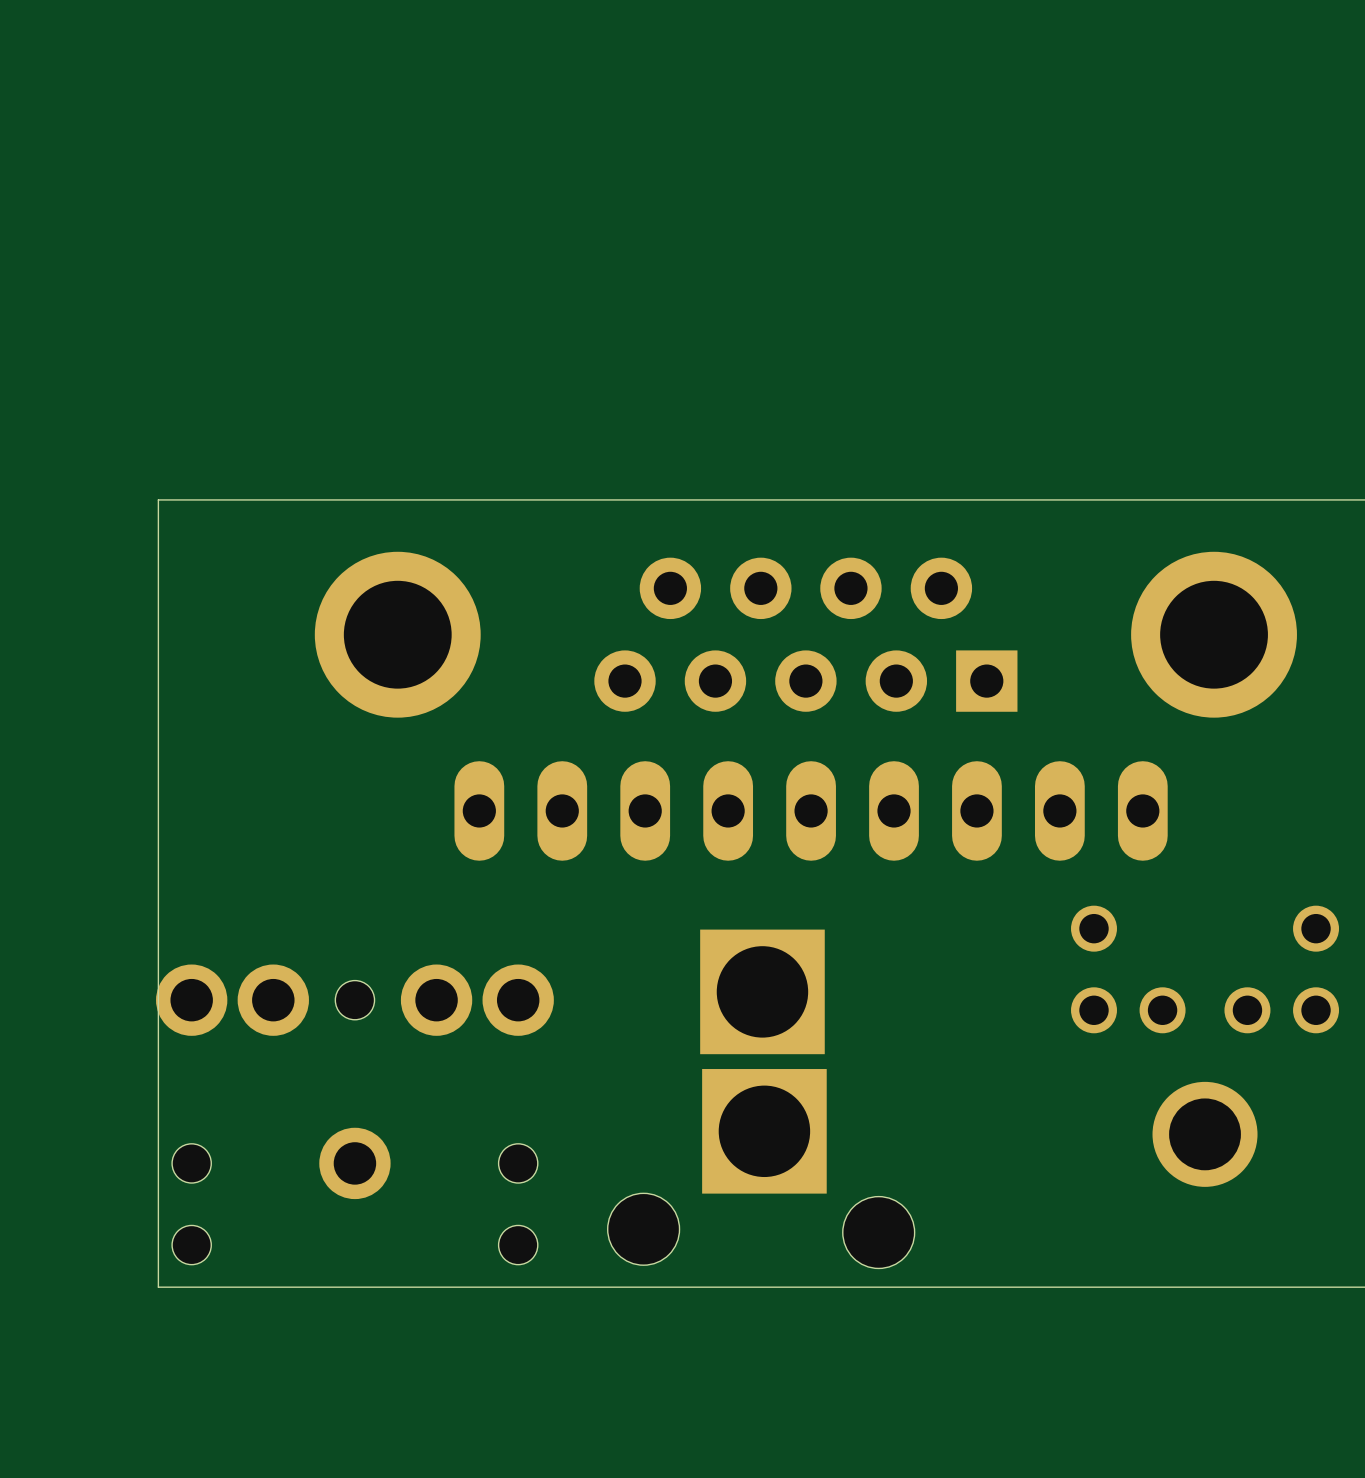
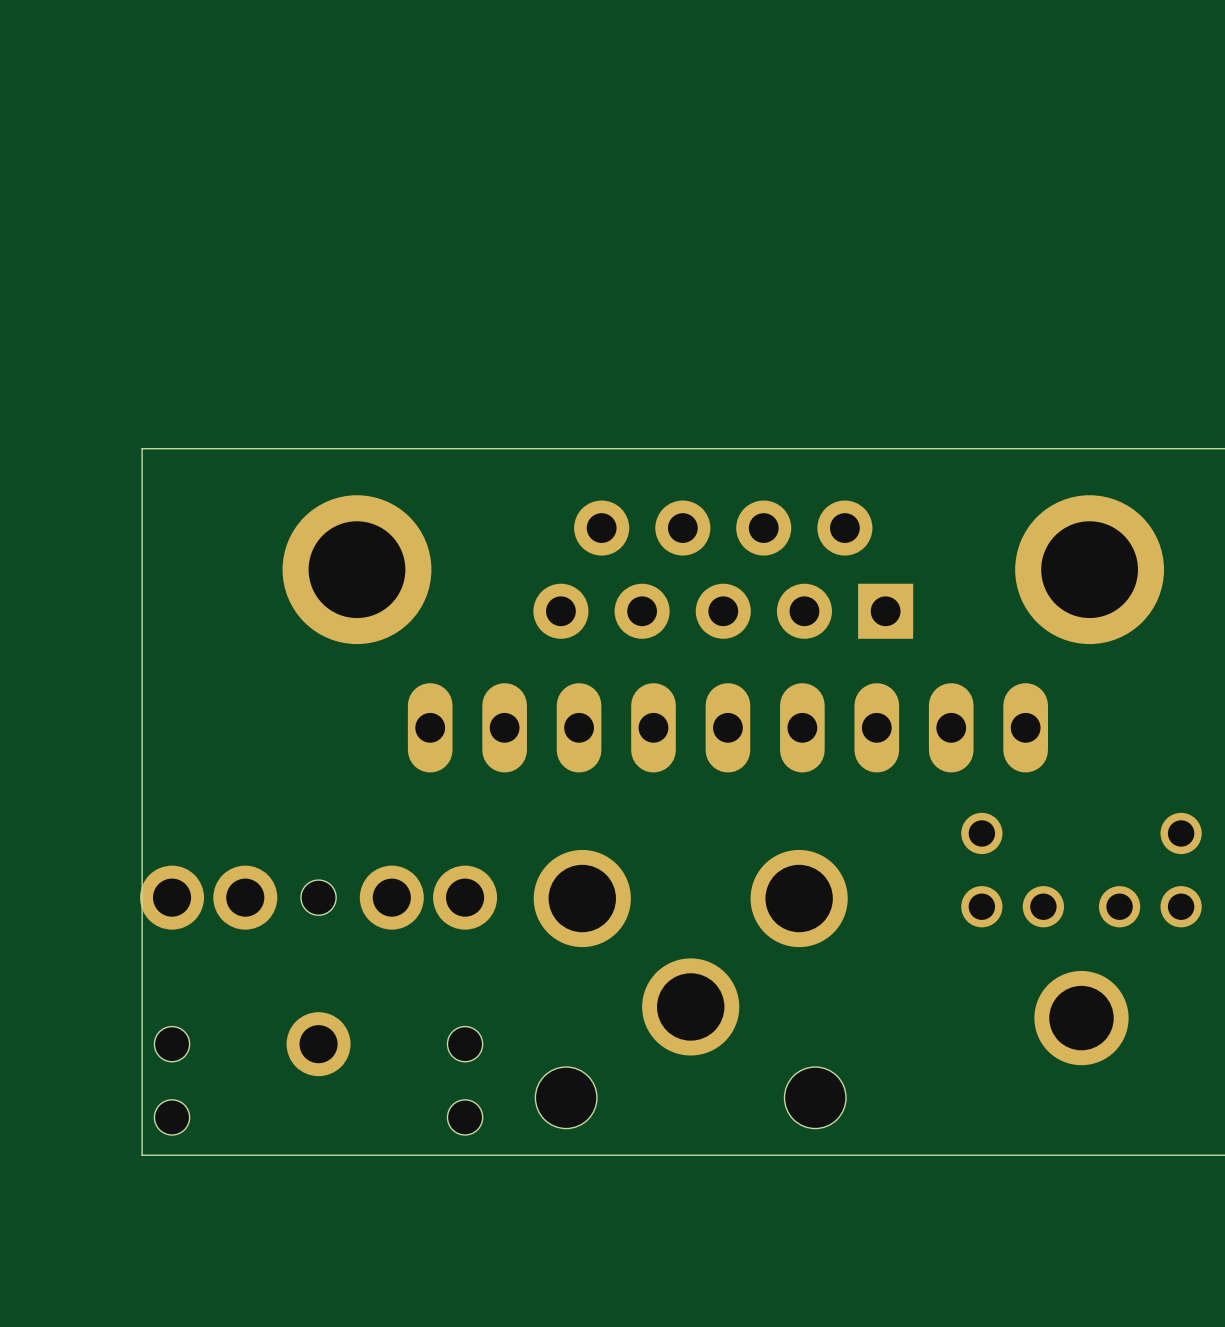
part footprint: [607, 929, 915, 1269] -> [533, 849, 848, 1129]

